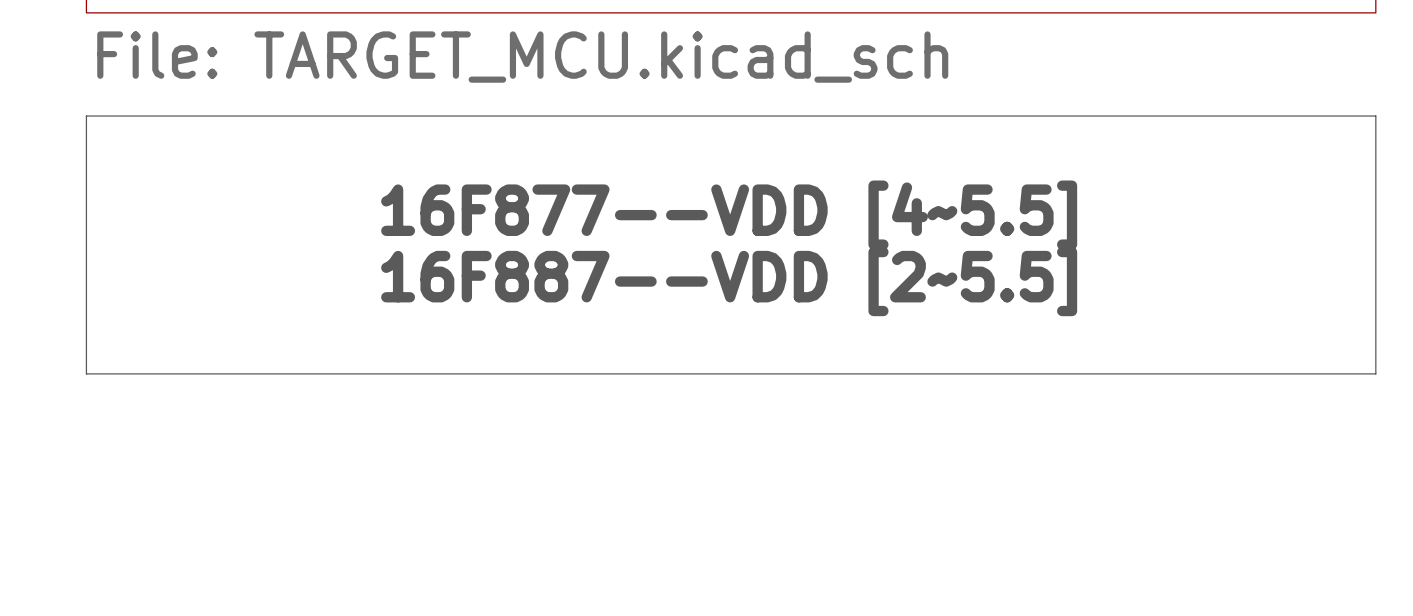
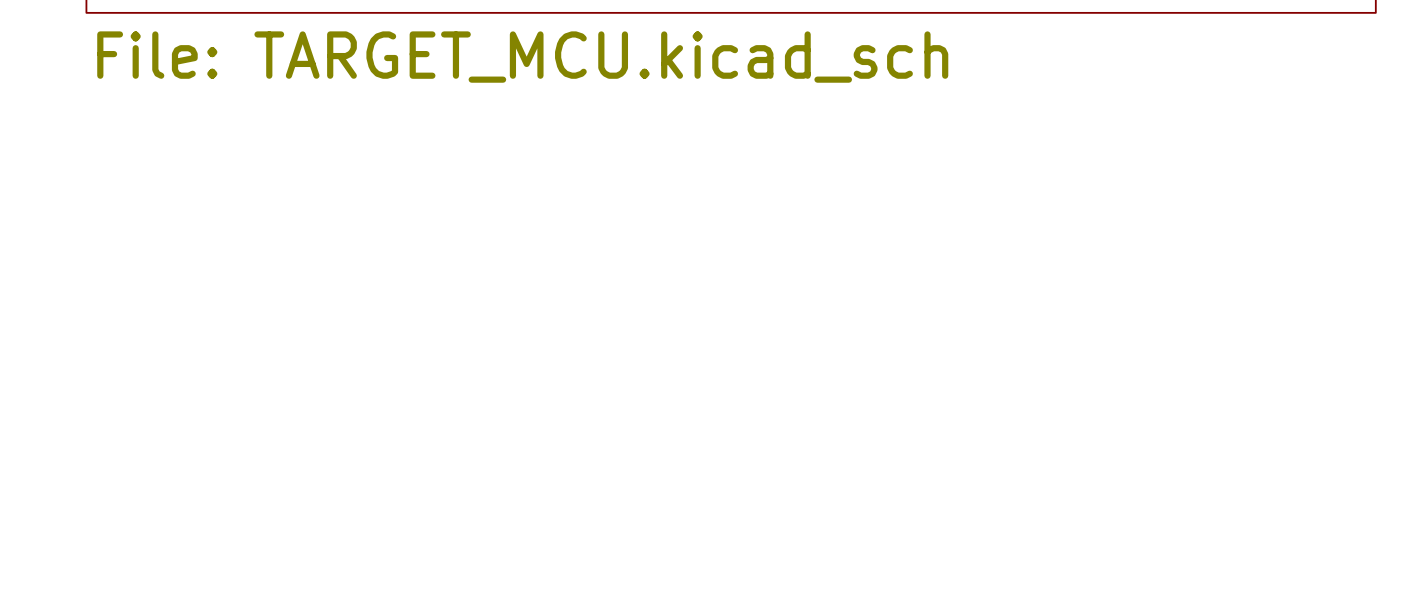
line: (86, 116) (1375, 116) (1375, 373) (86, 373) (86, 116) -> none
text: 16F877--VDD [4~5.5] (729, 215) -> none
text: 16F887--VDD [2~5.5] (729, 281) -> none

